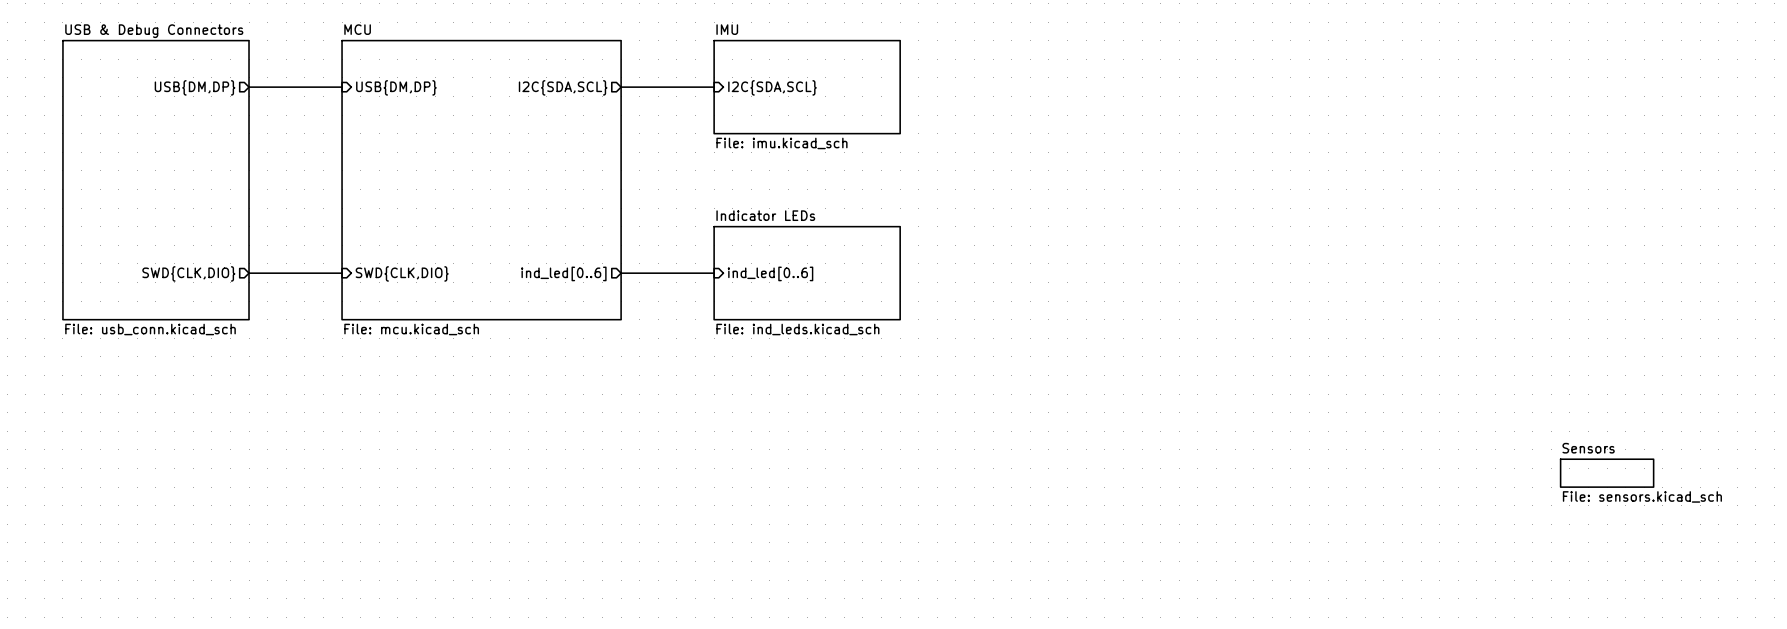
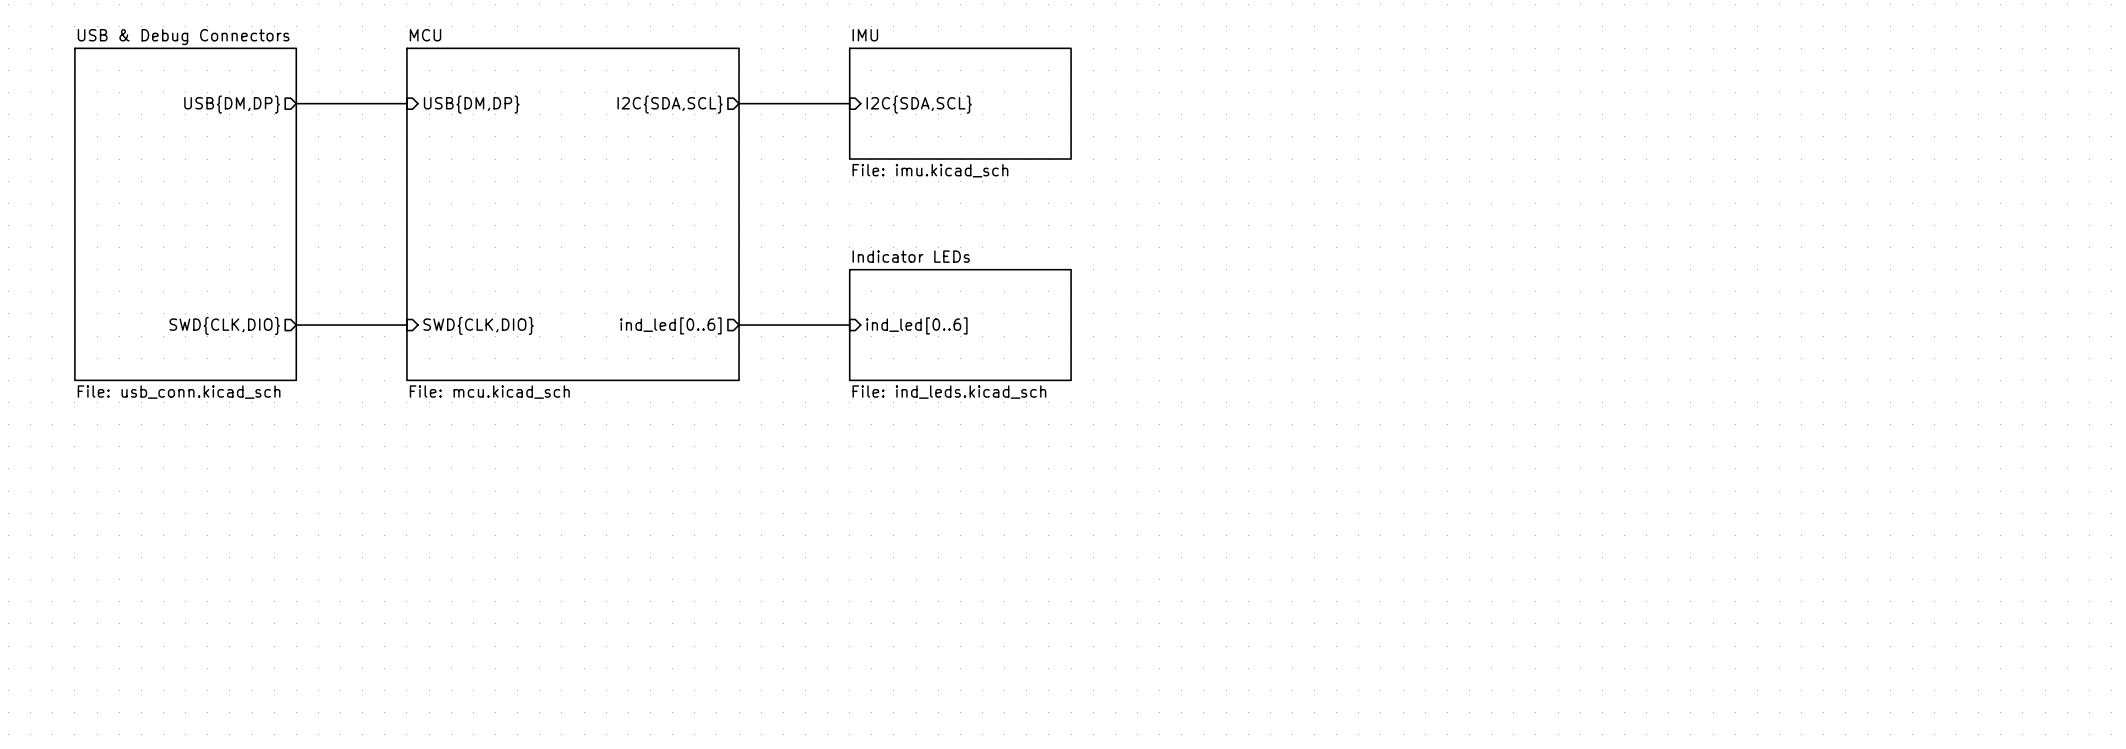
sheet Sensors: File: sensors.kicad_sch (1607, 473) -> none

